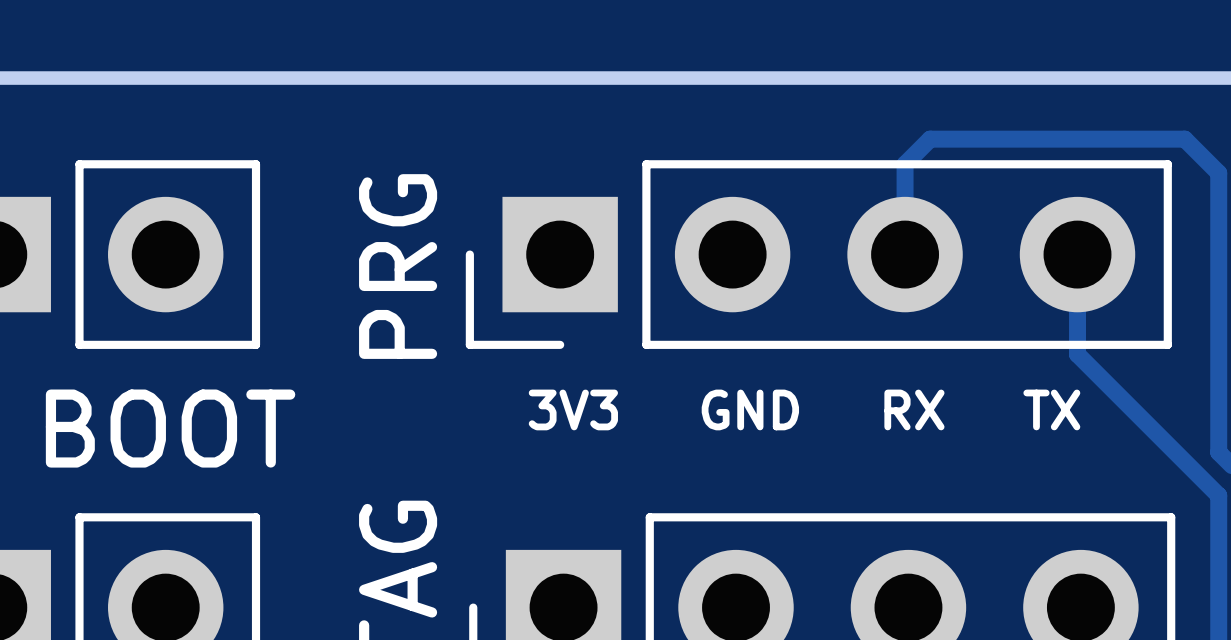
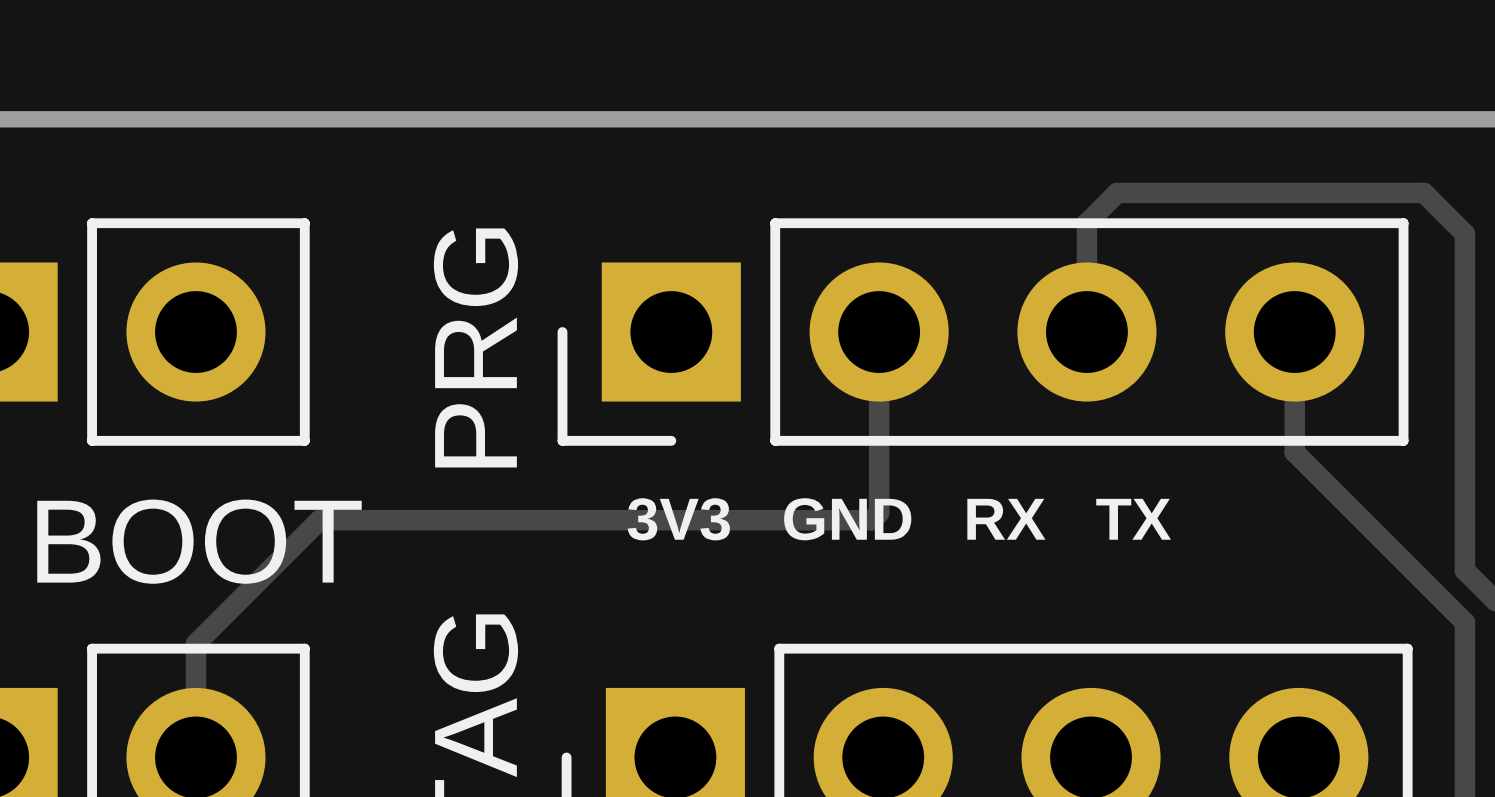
track: none -> (879, 332) (879, 512) (871, 520) (319, 520) (195, 643) (195, 757)

